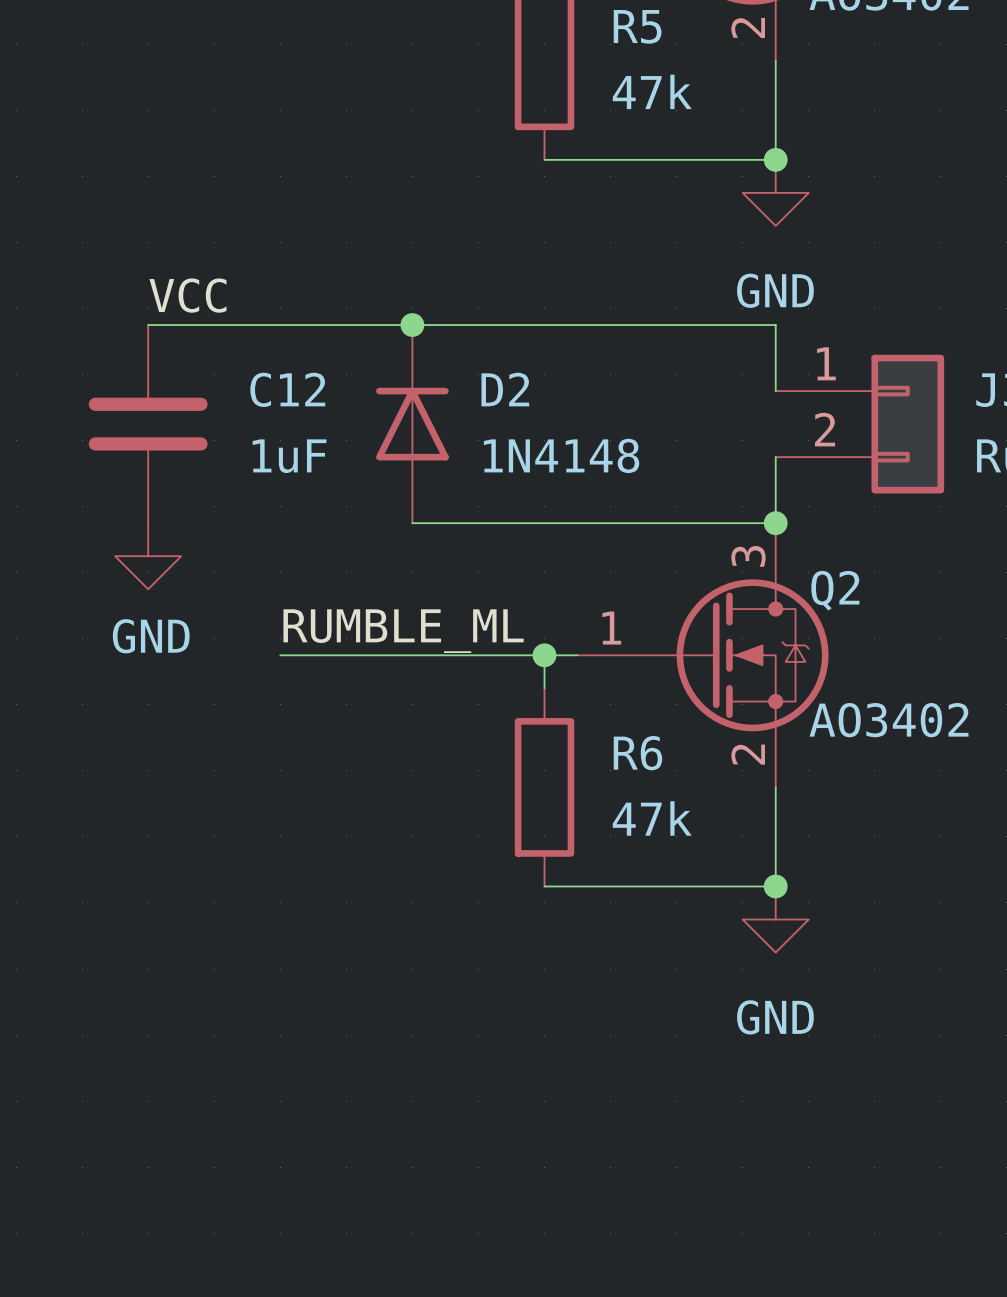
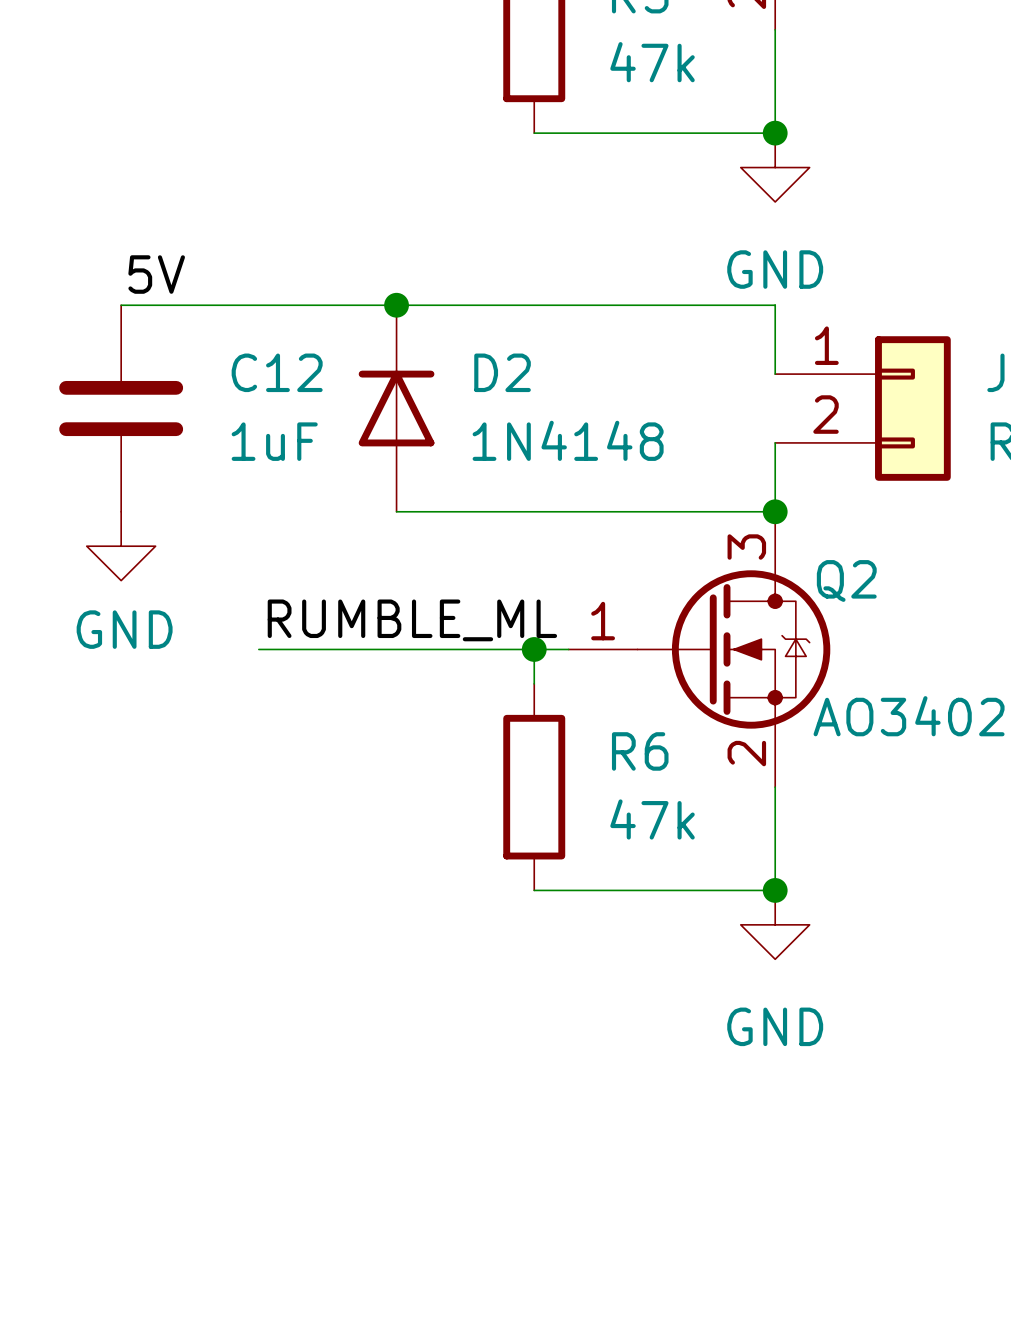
label: VCC (187, 295) -> 5V (156, 274)

